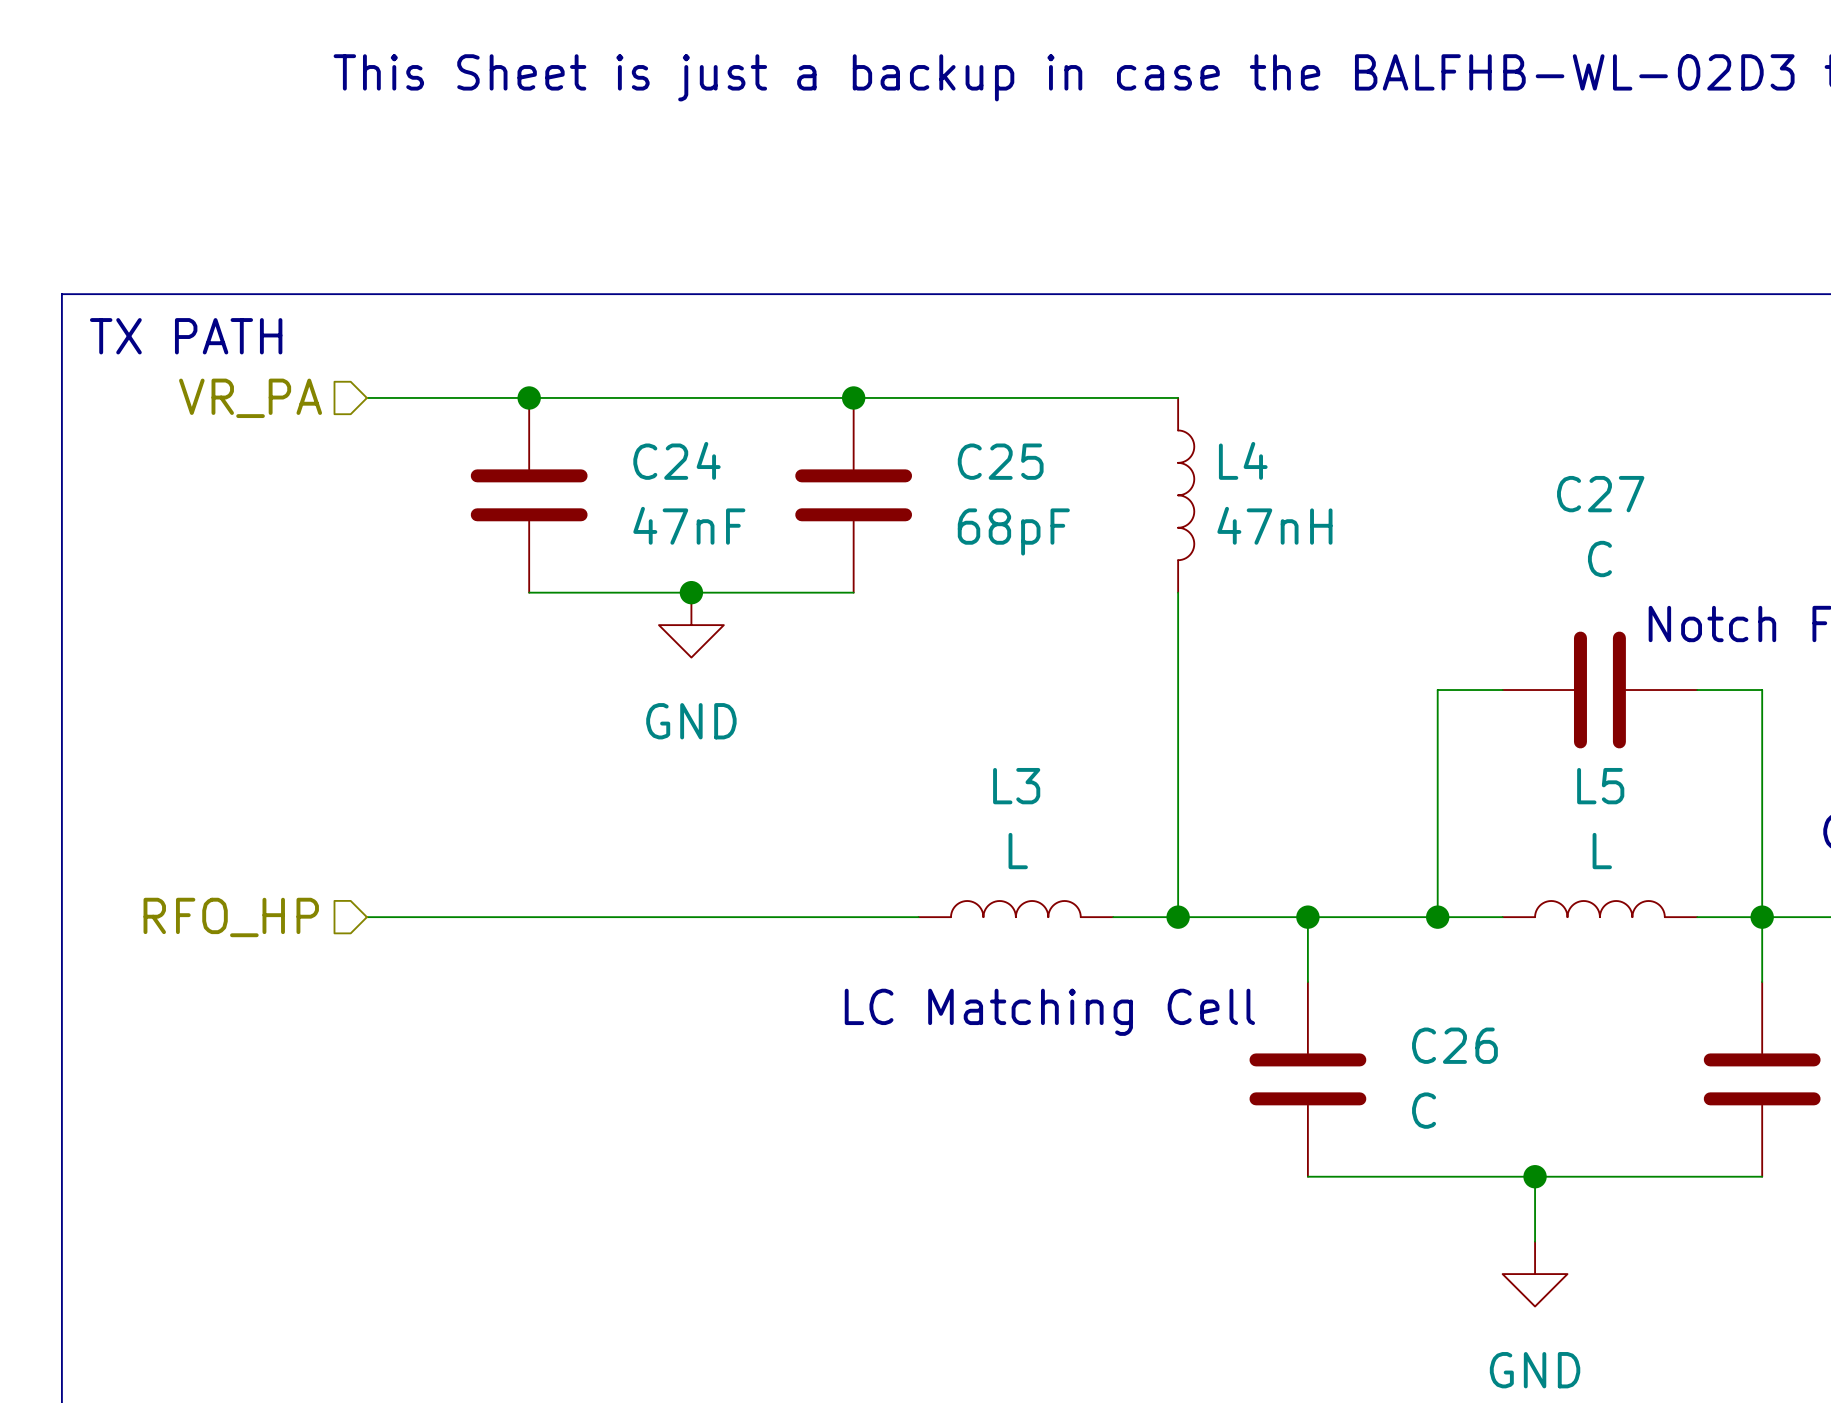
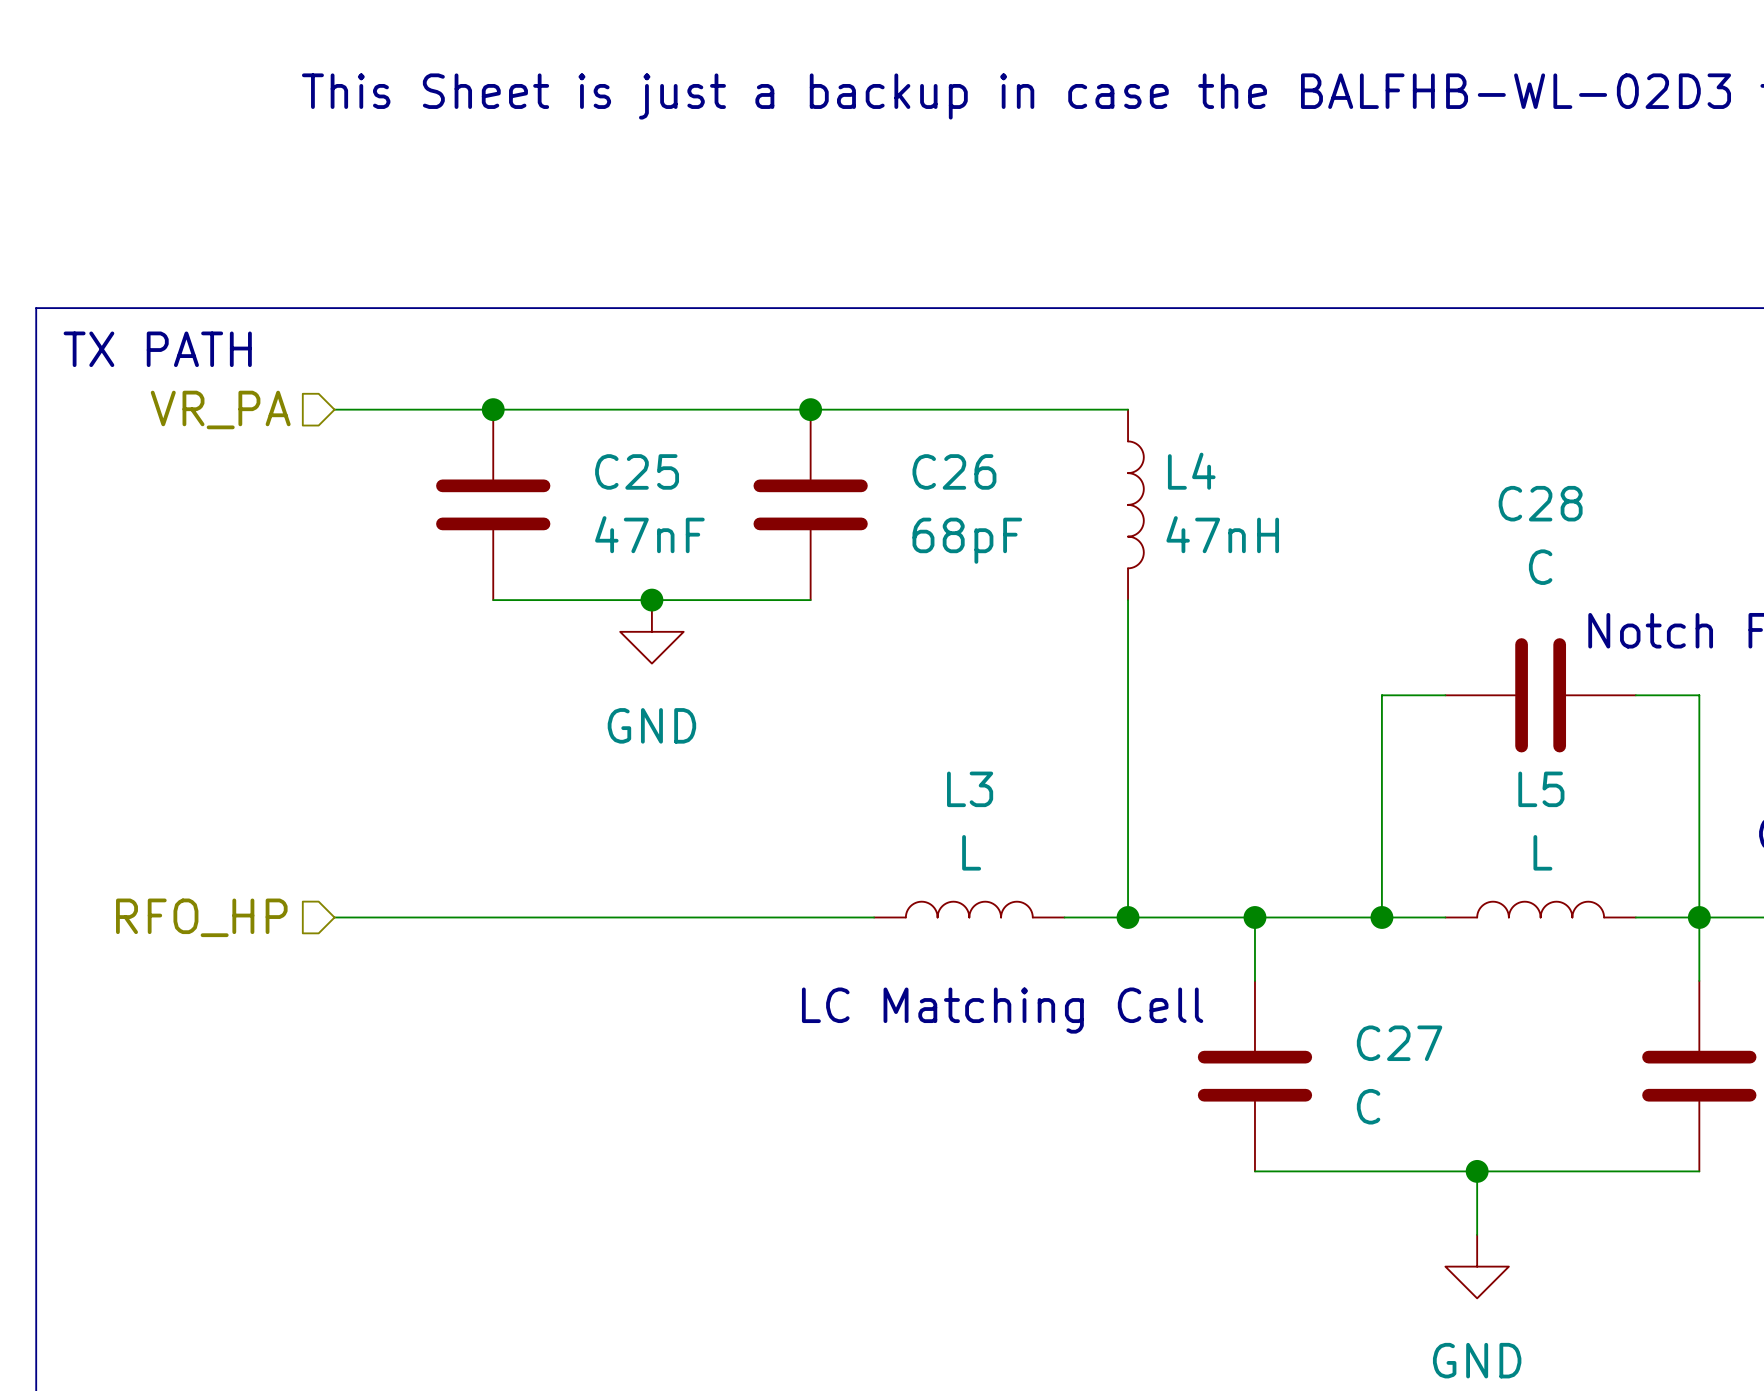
C24 name: C24 (676, 460) -> C25 (637, 471)
C25 name: C25 (1000, 461) -> C26 (954, 471)
C27 name: C27 (1600, 494) -> C28 (1540, 503)
C26 name: C26 (1454, 1045) -> C27 (1399, 1043)

